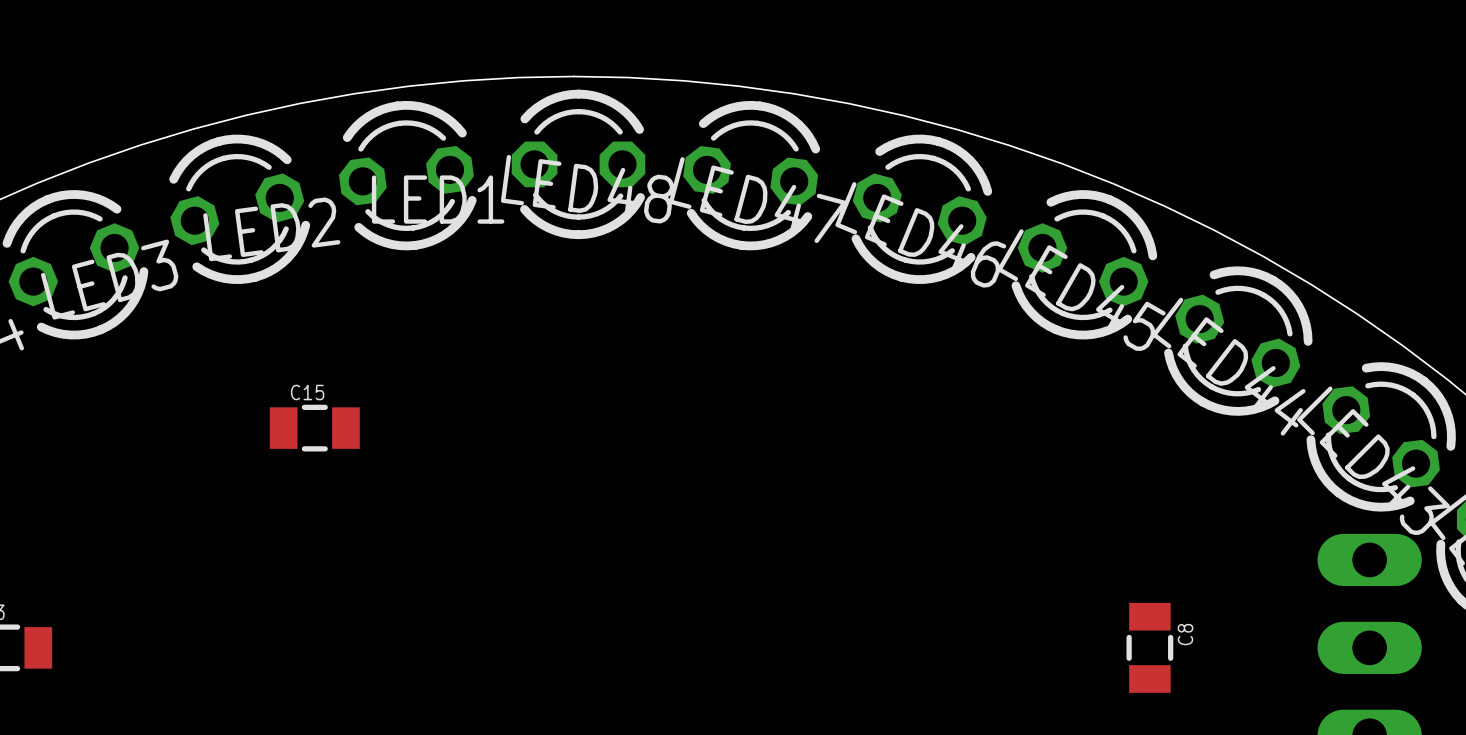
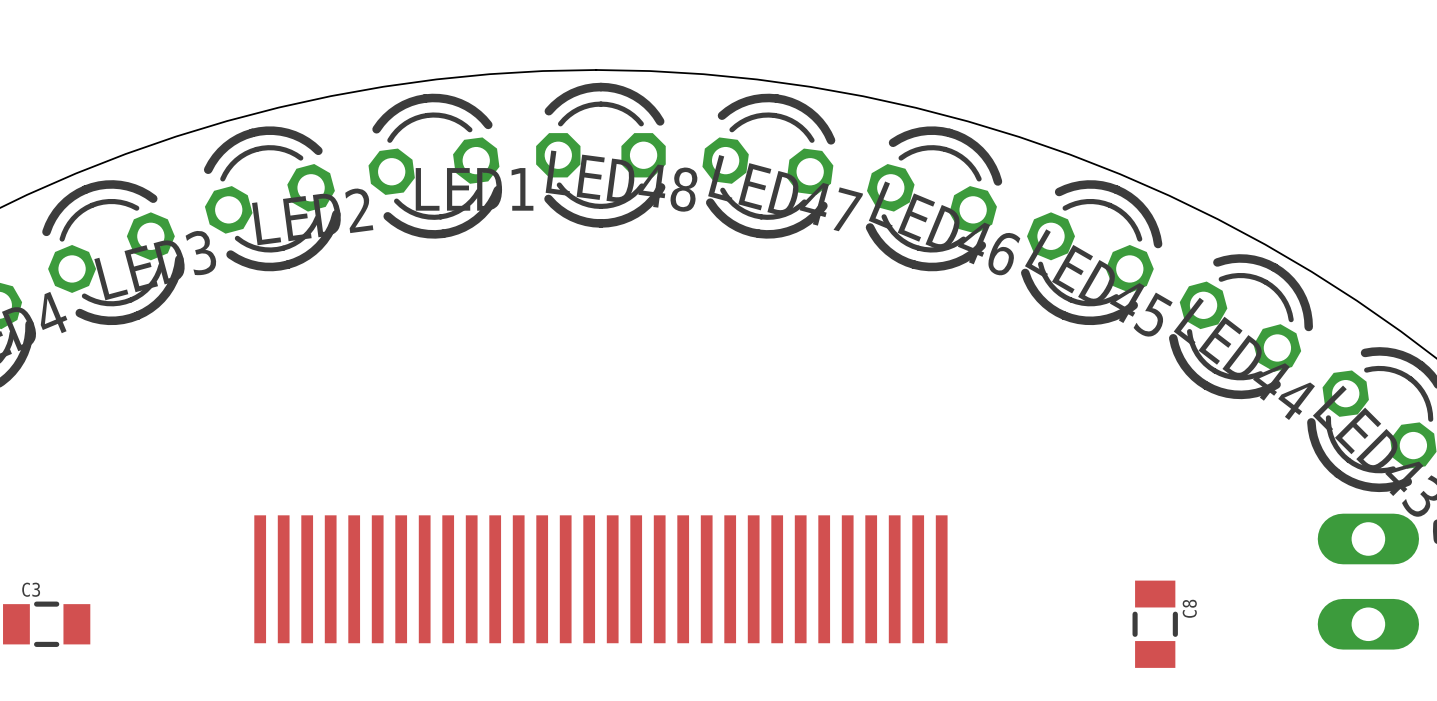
C15: (314, 428) -> none
part: none -> (600, 579)

